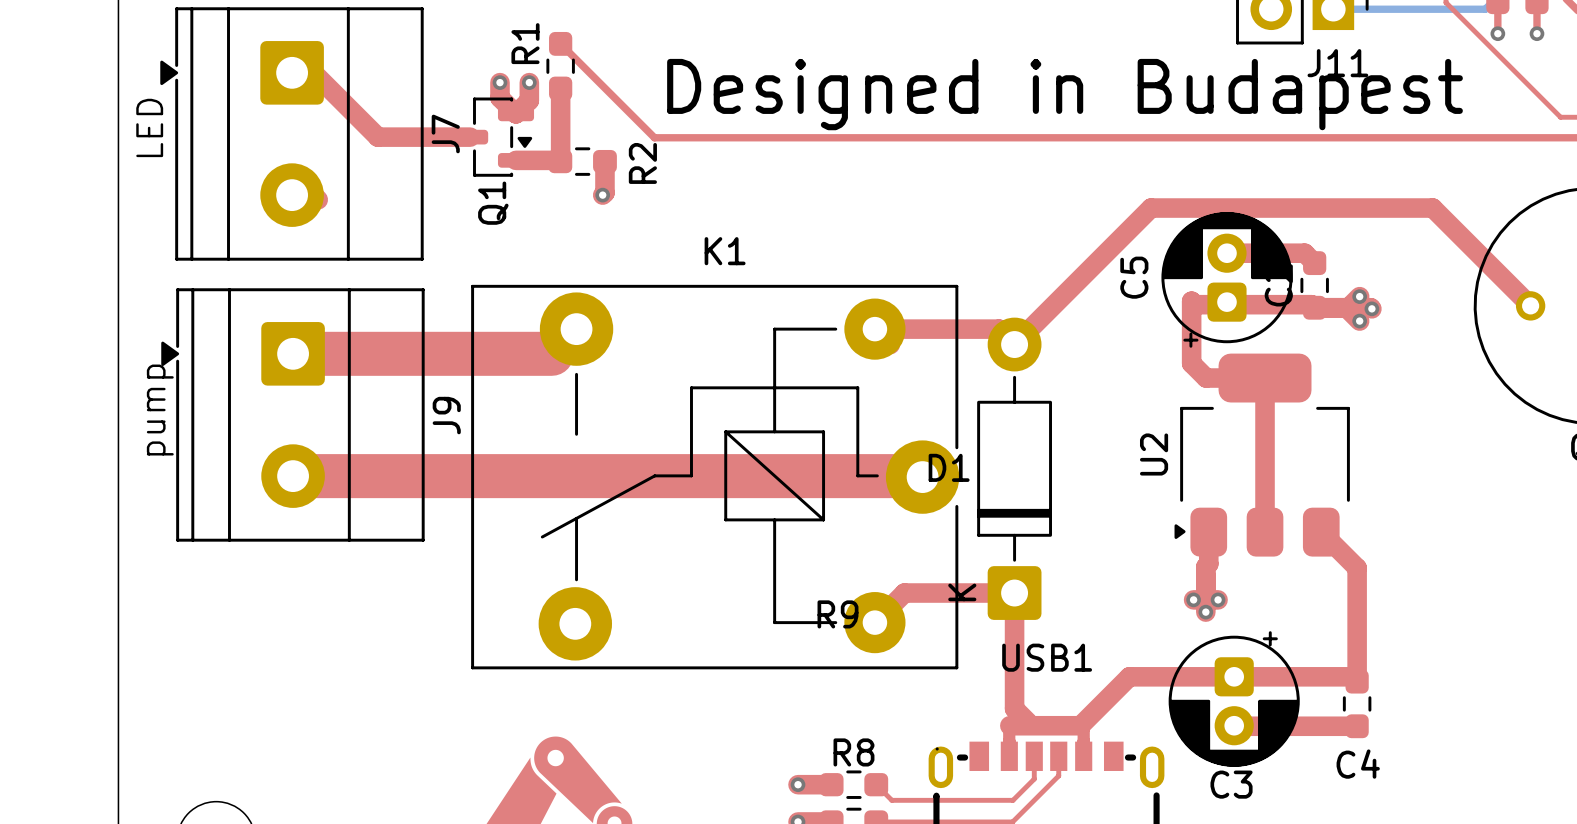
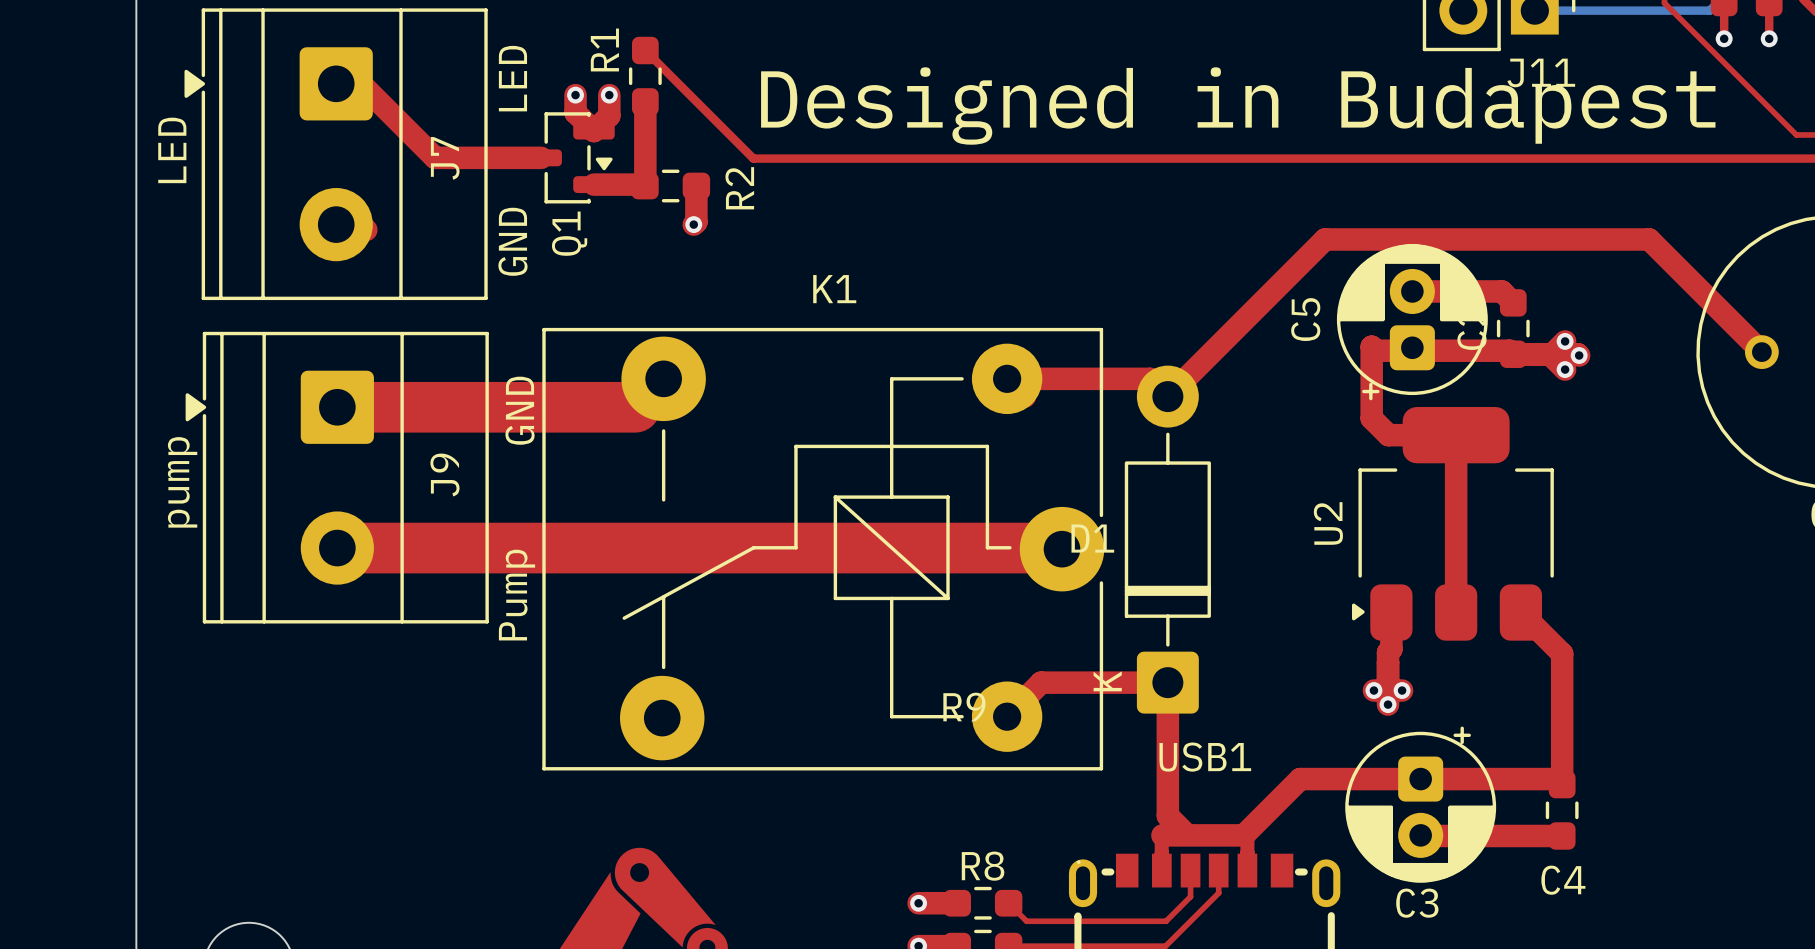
text: none -> LED (512, 78)
J7 name position: J7 (445, 133) -> J7 (445, 158)
text: none -> GND (512, 241)
text: none -> GND (520, 410)
J9 name position: J9 (446, 415) -> J9 (444, 474)
text: none -> Pump (517, 595)

